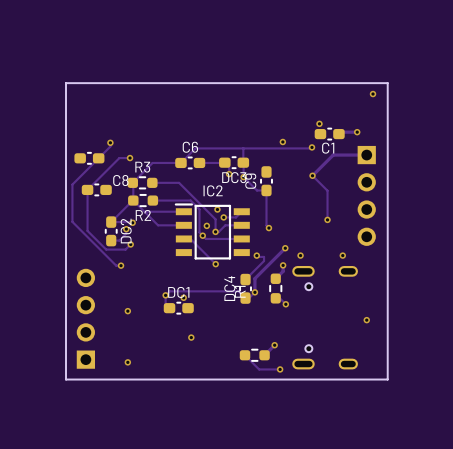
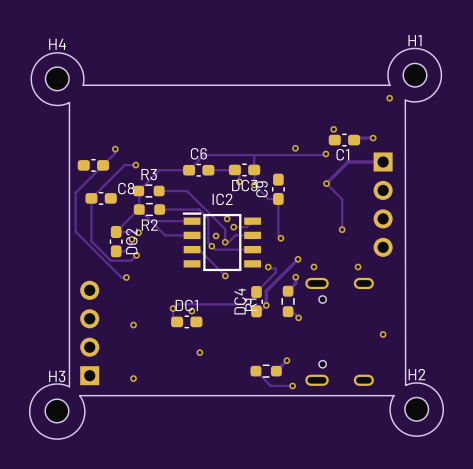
H1: none -> (414, 75)
H4: none -> (57, 78)
board edge: (66, 83) (387, 83) (387, 379) (66, 379) (66, 83) -> (83, 85) (83, 75) (80, 65) (73, 58) (64, 53) (54, 53) (44, 56) (36, 62) (32, 71) (32, 88) (40, 99) (56, 105) (69, 102) (69, 386) (52, 384) (42, 388) (35, 394) (30, 404) (29, 414) (32, 424) (39, 432) (55, 439) (65, 437) (74, 433) (81, 425) (84, 415) (84, 405) (79, 395) (394, 395) (390, 405) (390, 415) (394, 424) (402, 431) (418, 436) (428, 433) (436, 427) (443, 411) (438, 395) (425, 384) (415, 382) (405, 385) (405, 100) (415, 101) (425, 99) (438, 88) (441, 71) (433, 56) (417, 48) (401, 52) (393, 58) (388, 68) (389, 85) (83, 85)
H2: none -> (416, 409)
H3: none -> (56, 410)

